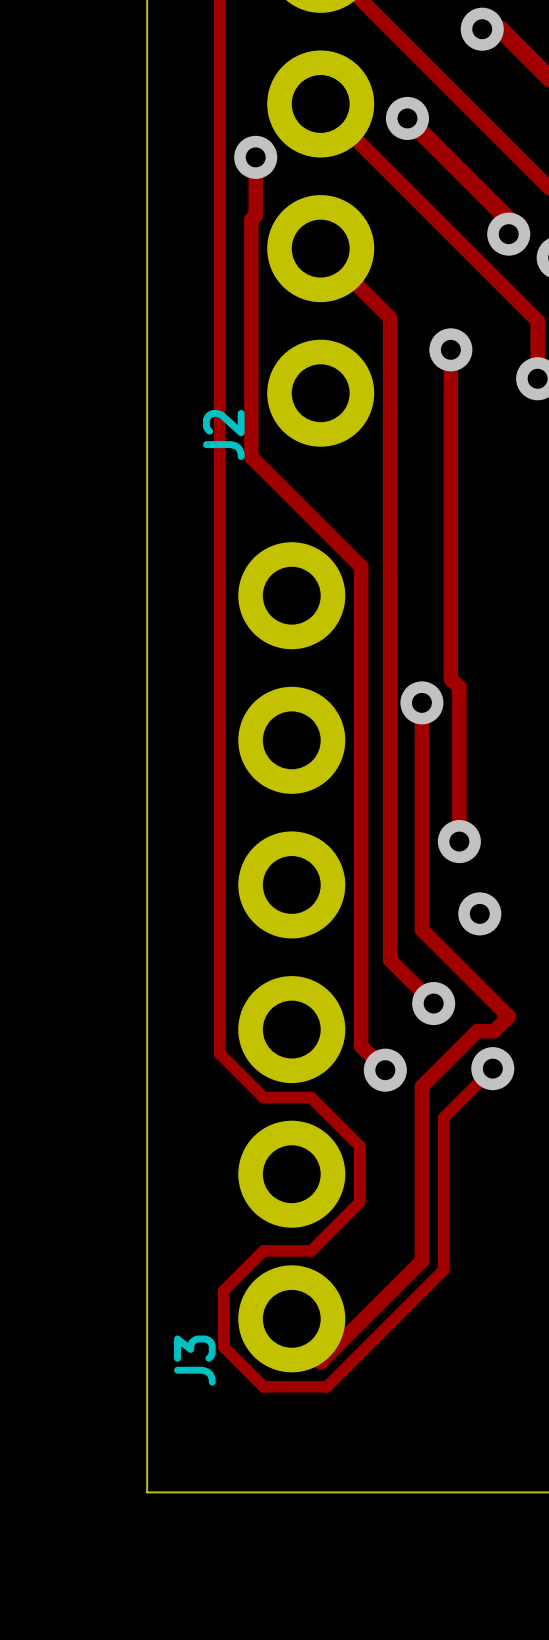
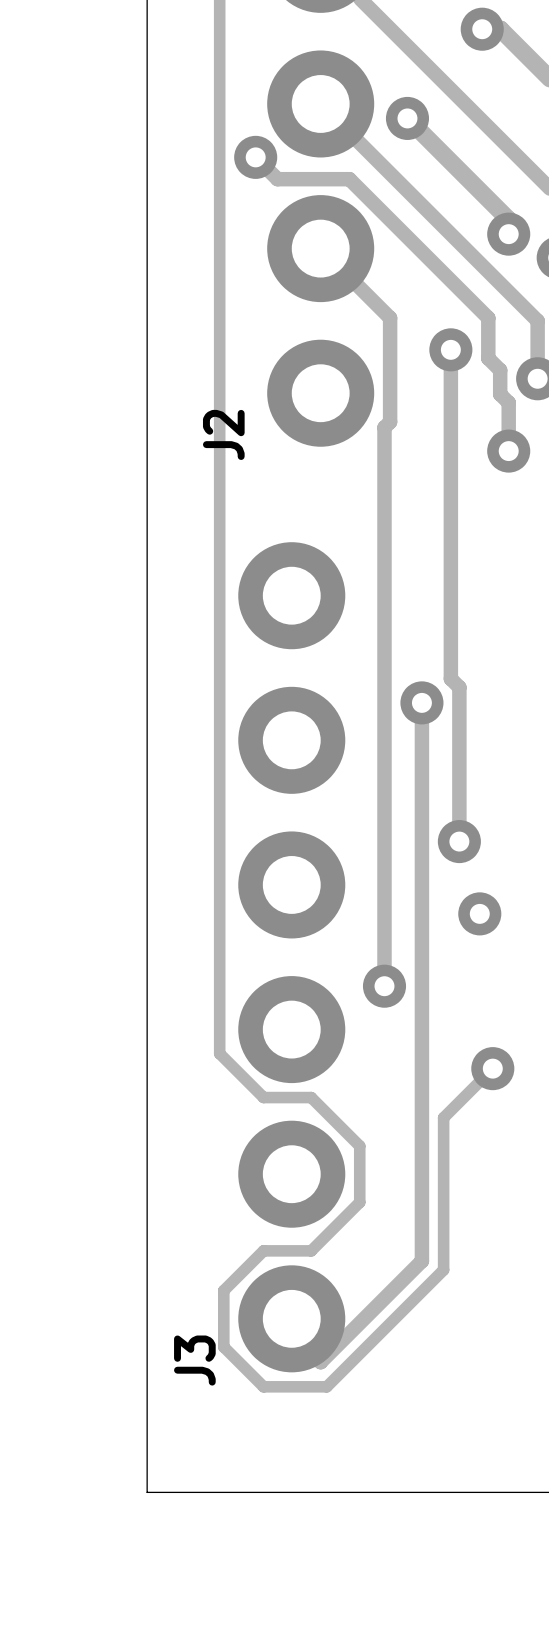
track: (255, 157) (255, 215) (251, 219) (251, 457) (361, 566) (361, 1046) (385, 1070) -> (255, 157) (277, 179) (349, 179) (488, 318) (488, 358) (500, 370) (500, 394) (508, 402) (508, 451)
track: (390, 421) (390, 960) (433, 1003) -> (390, 421) (384, 427) (384, 986)
via: none -> (508, 451)
track: (421, 929) (508, 1016) (494, 1031) (477, 1031) (421, 1086) -> (421, 929) (421, 1086)
via: none -> (384, 986)
via: (433, 1003) -> none
via: (385, 1070) -> none

